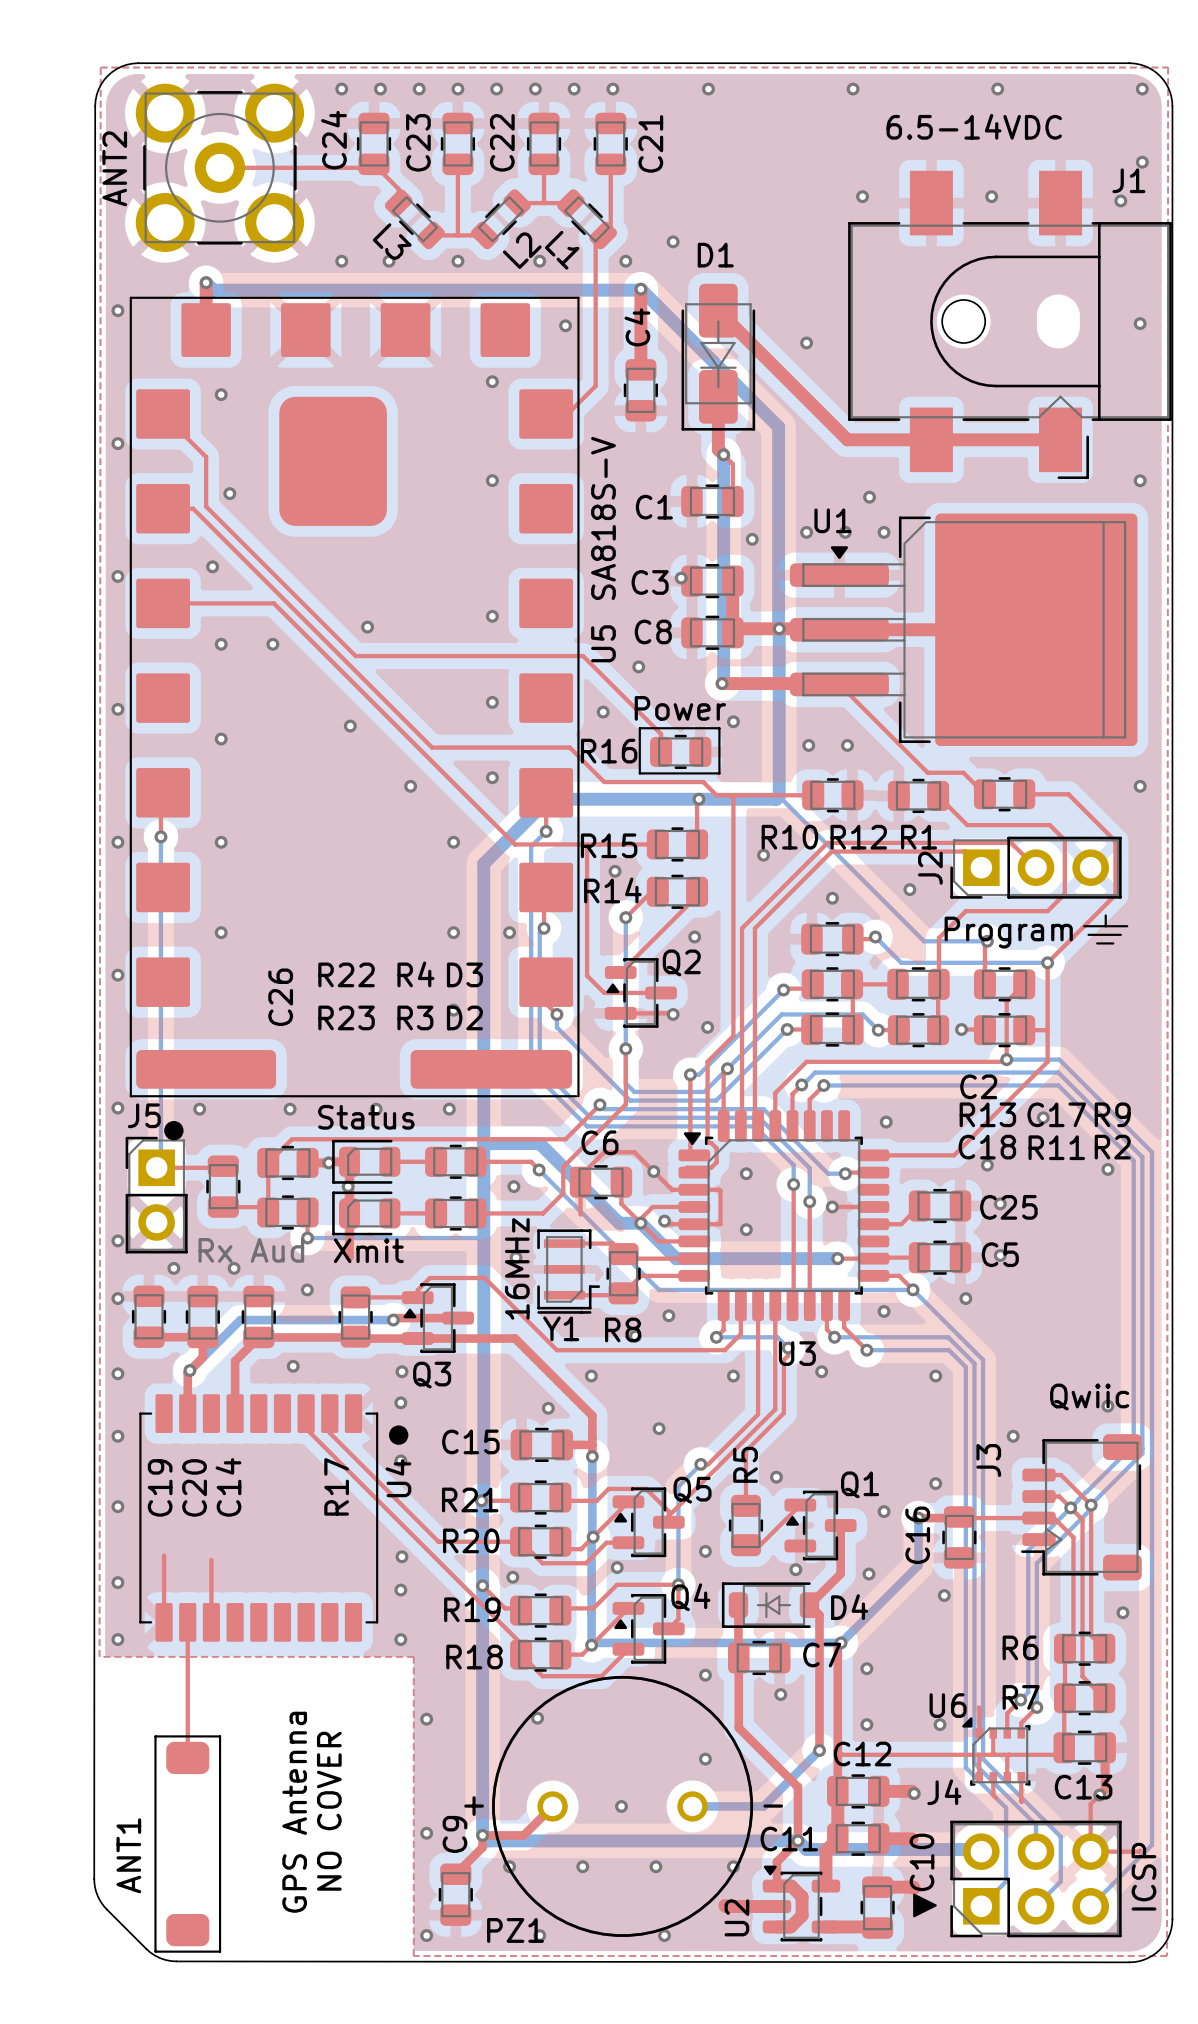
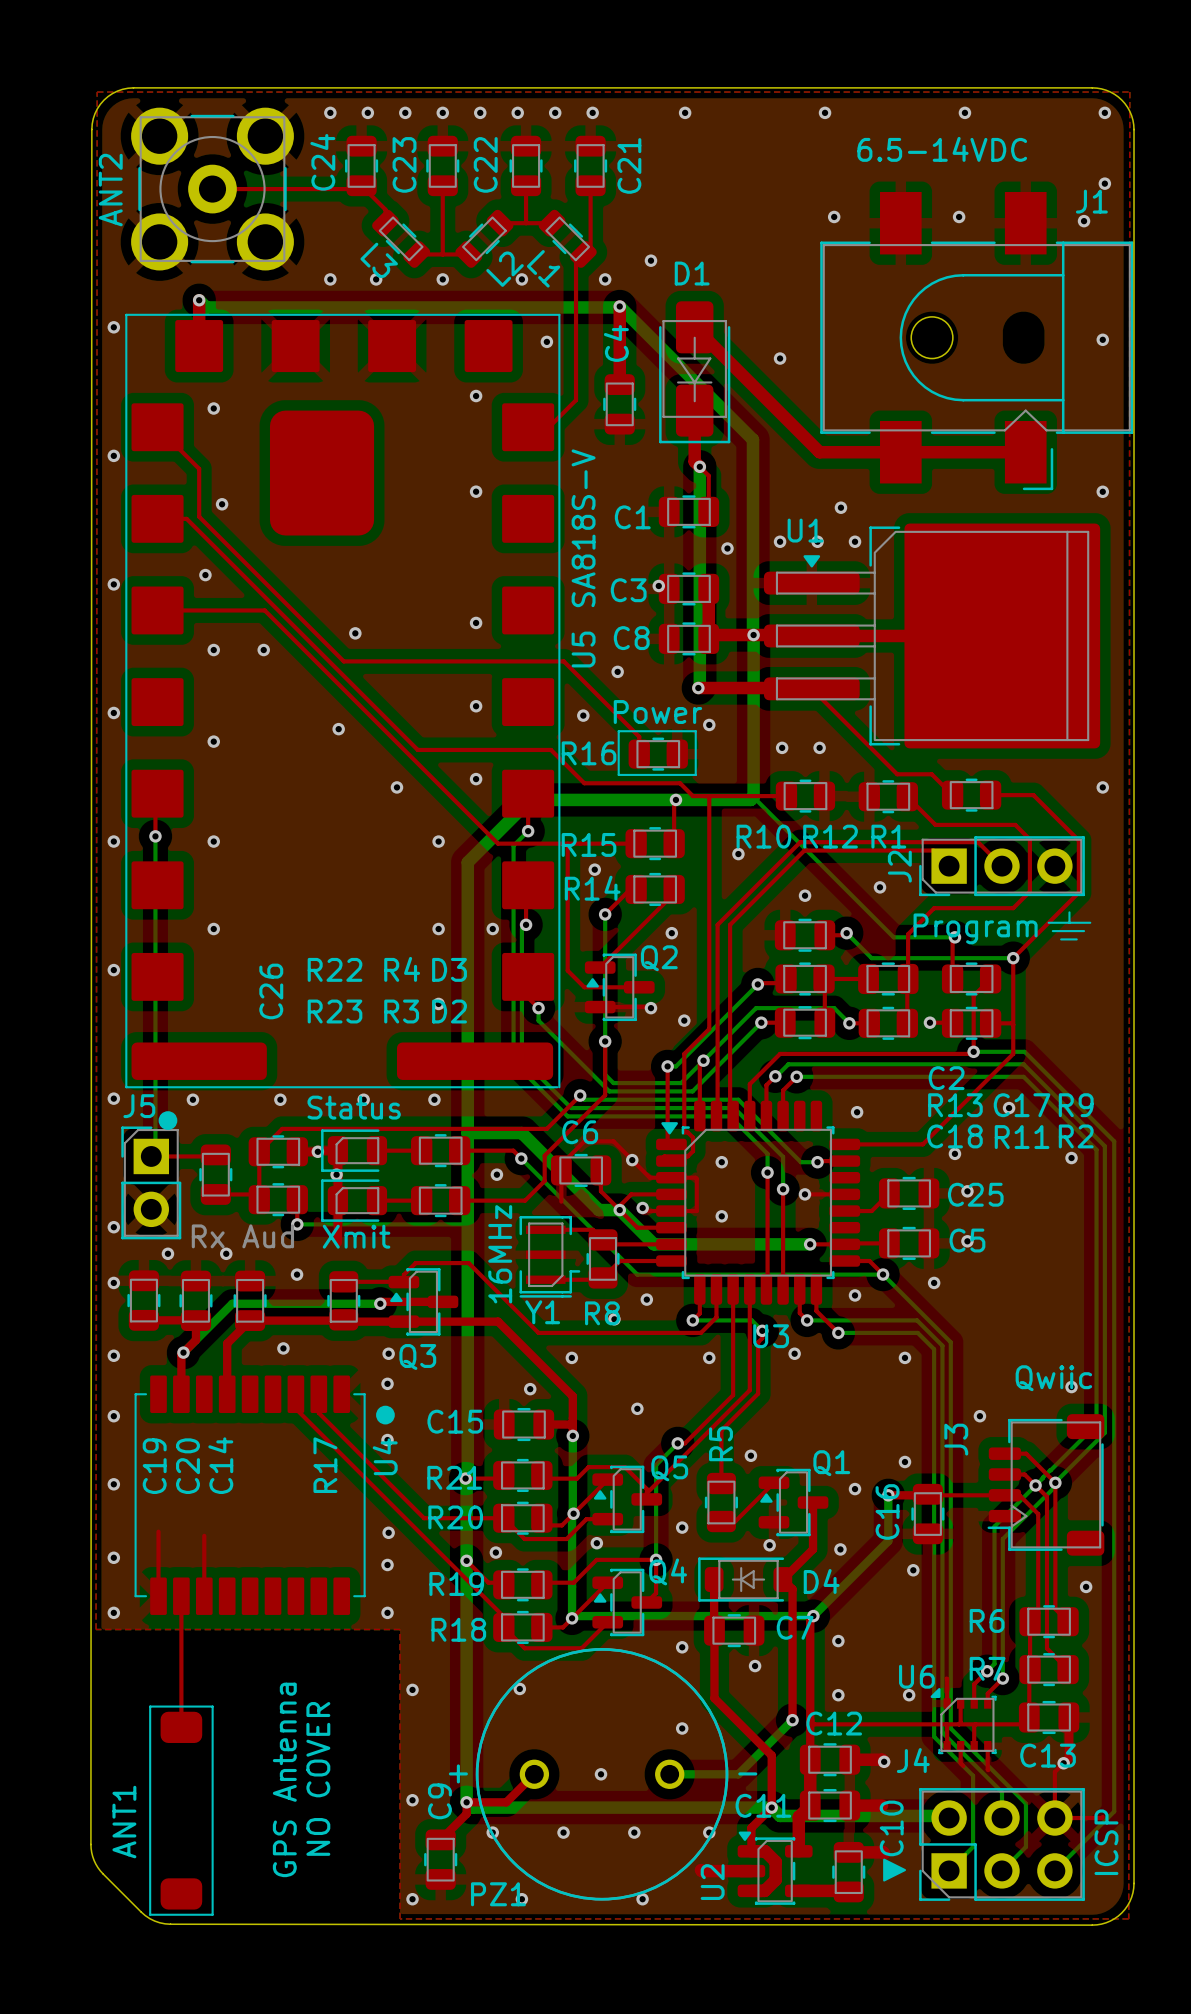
via: (516, 1257) -> none

